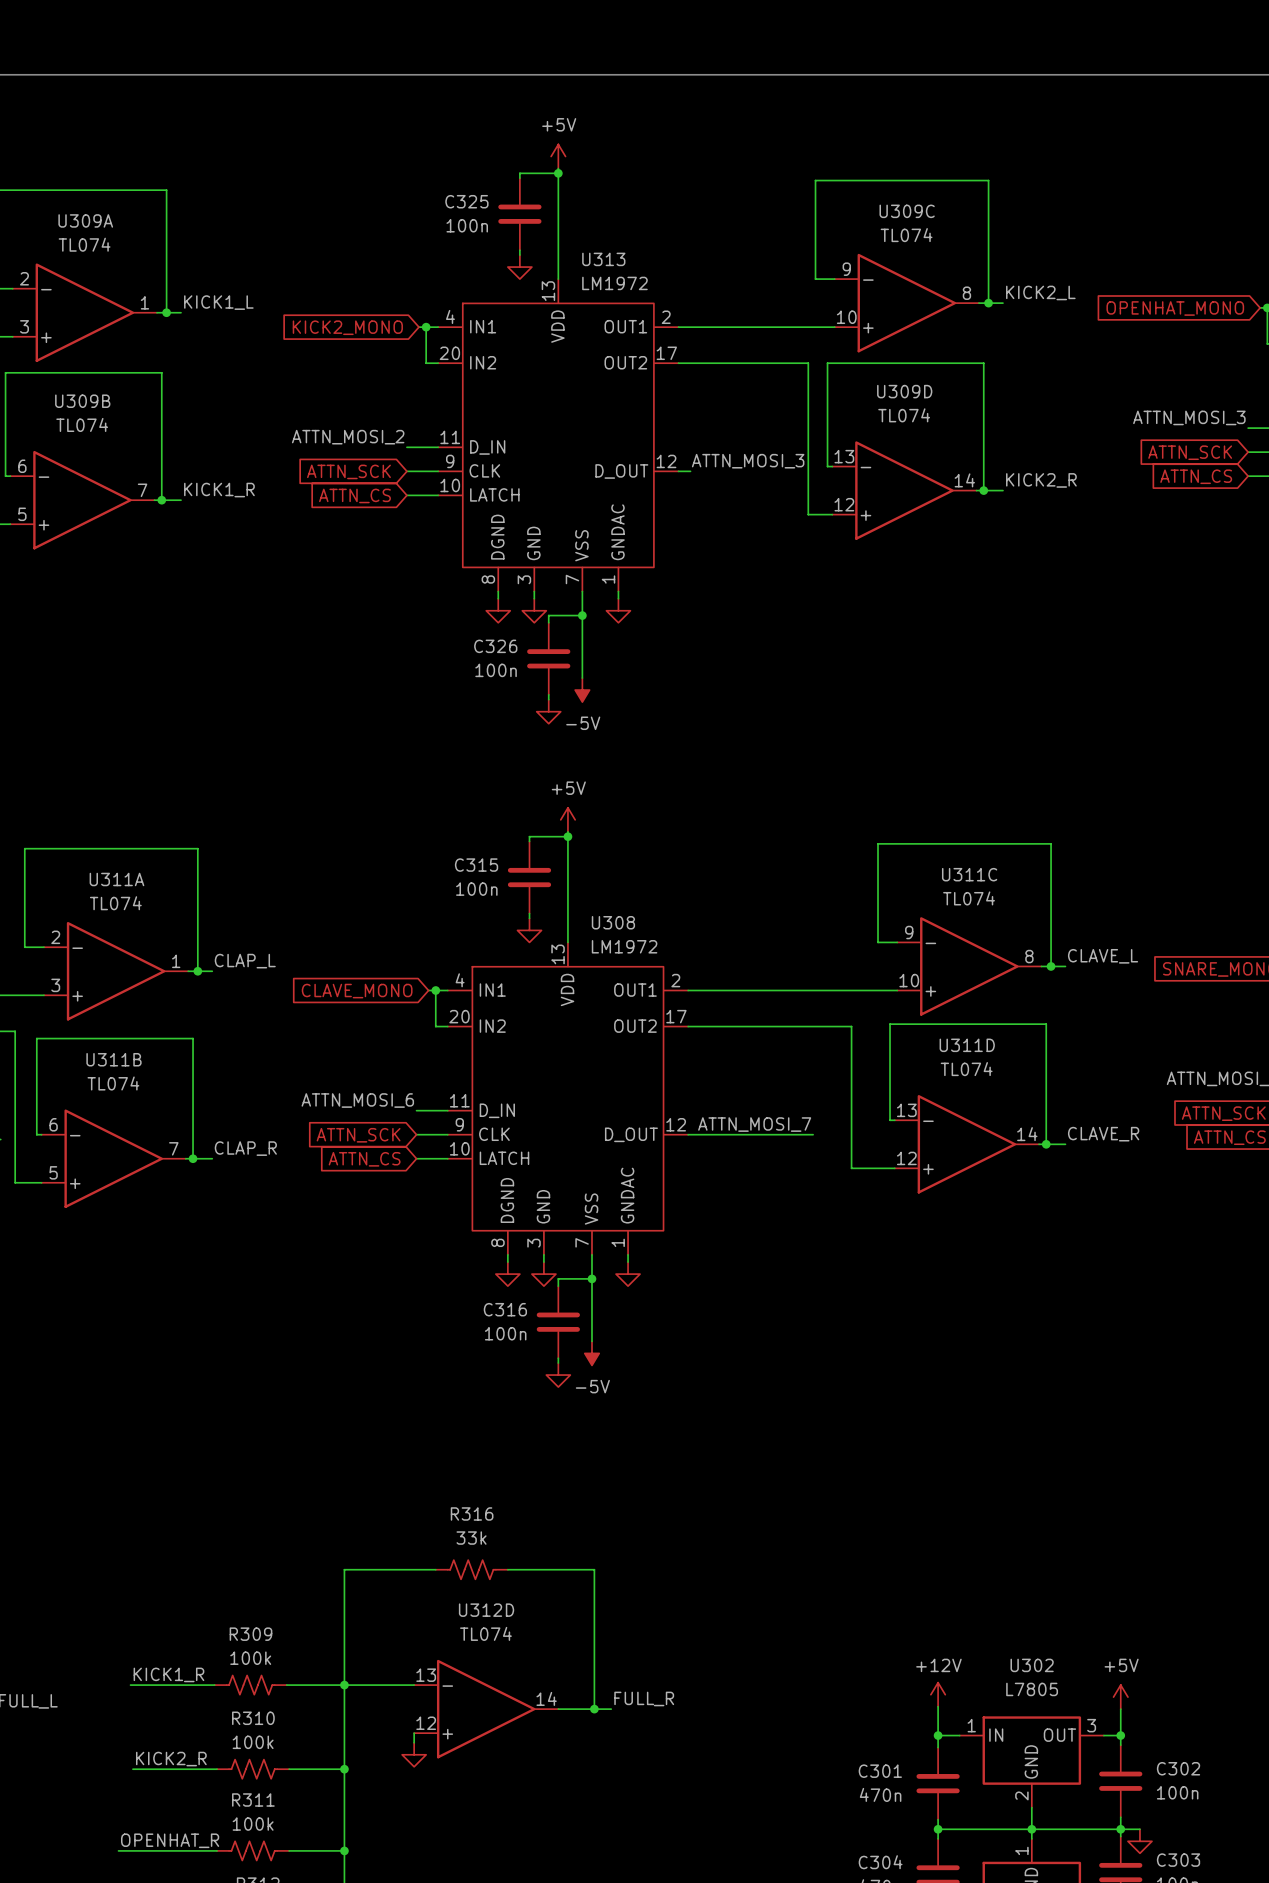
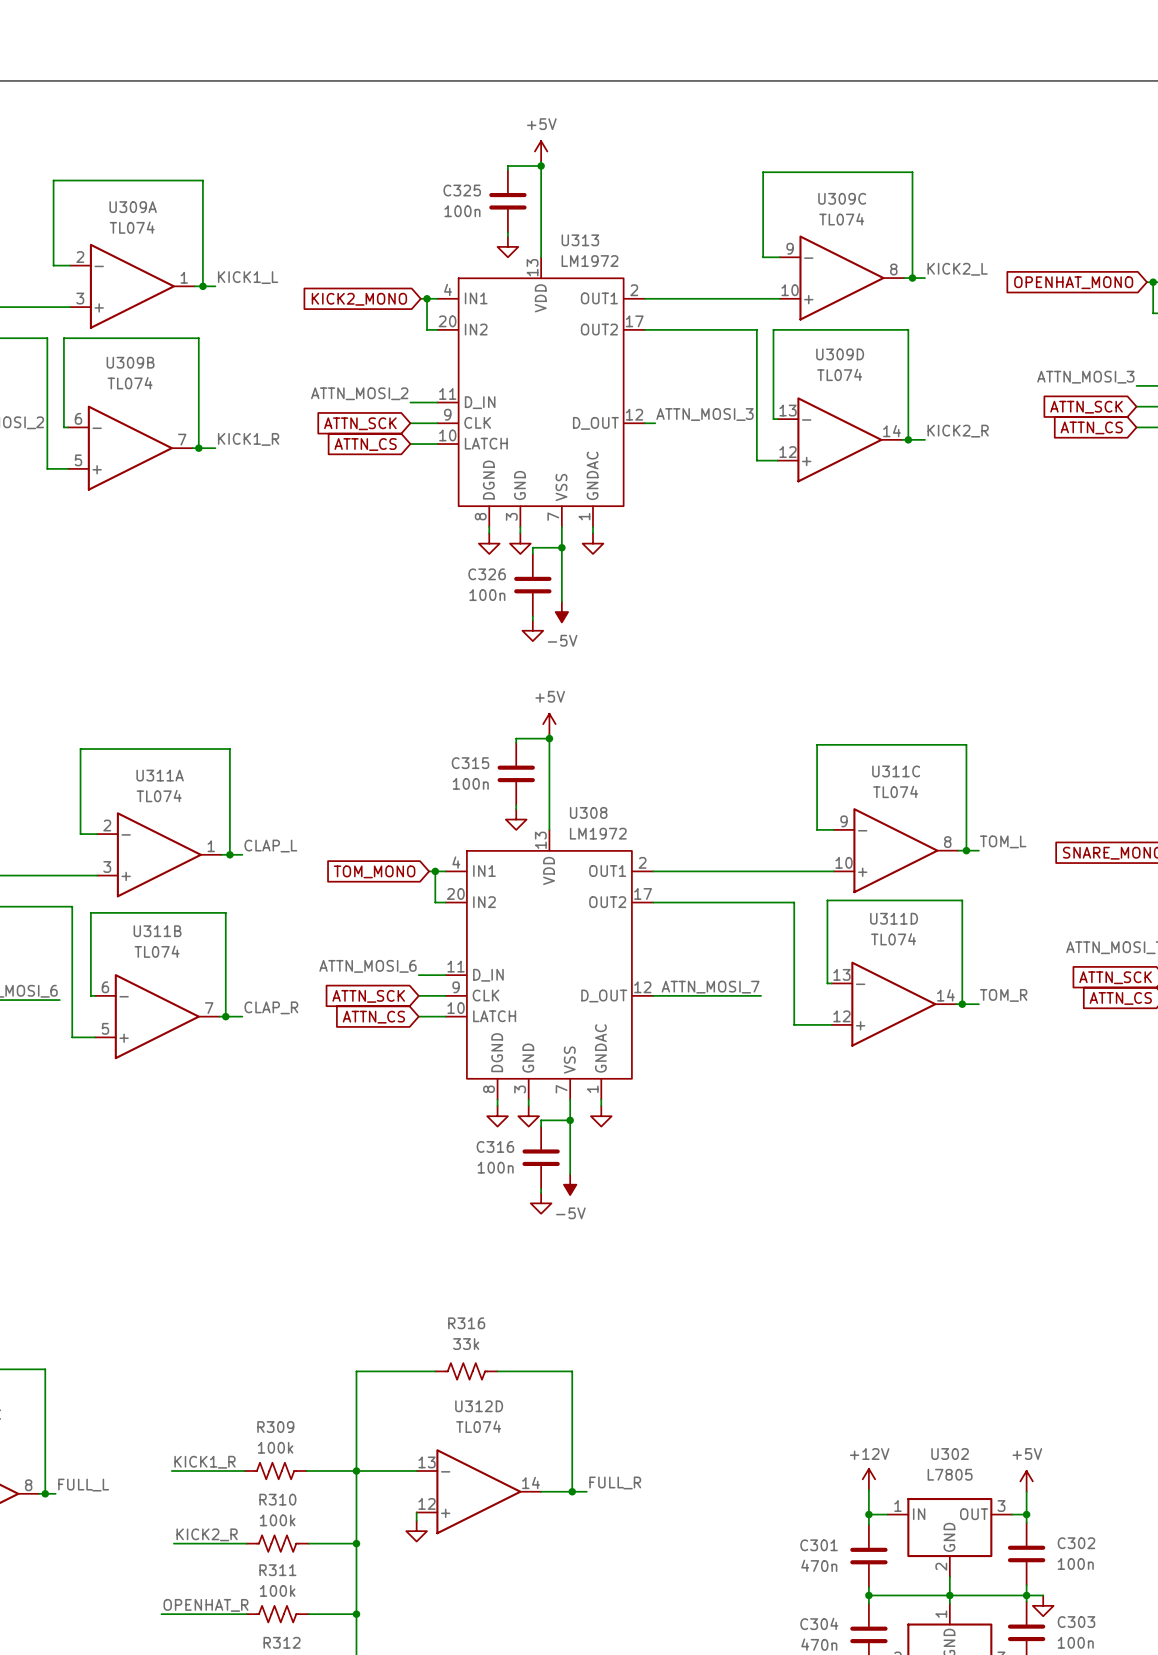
label: CLAVE_L (1103, 956) -> TOM_L (1003, 841)
global label: CLAVE_MONO (357, 991) -> TOM_MONO (374, 871)
label: CLAVE_R (1103, 1134) -> TOM_R (1003, 995)

